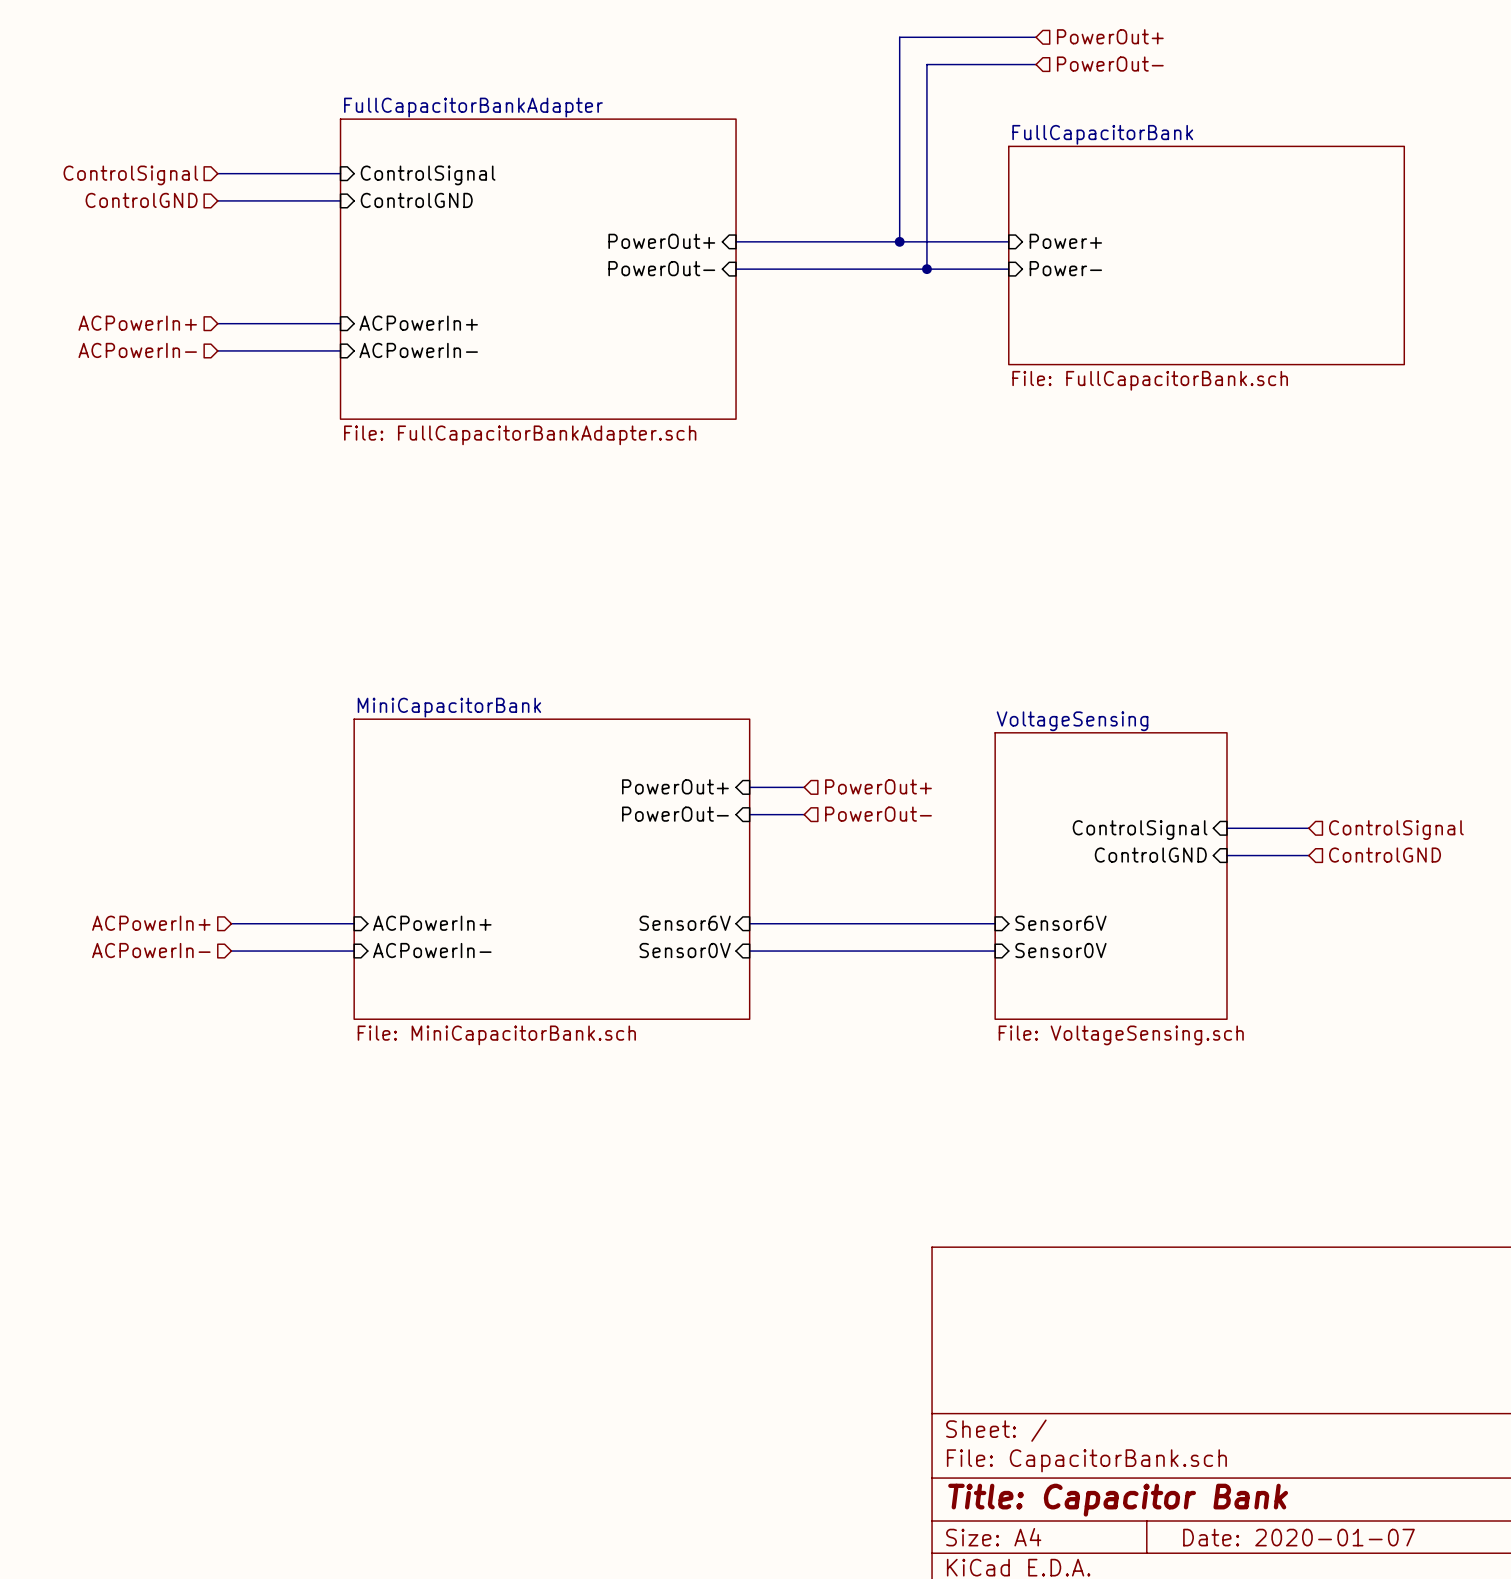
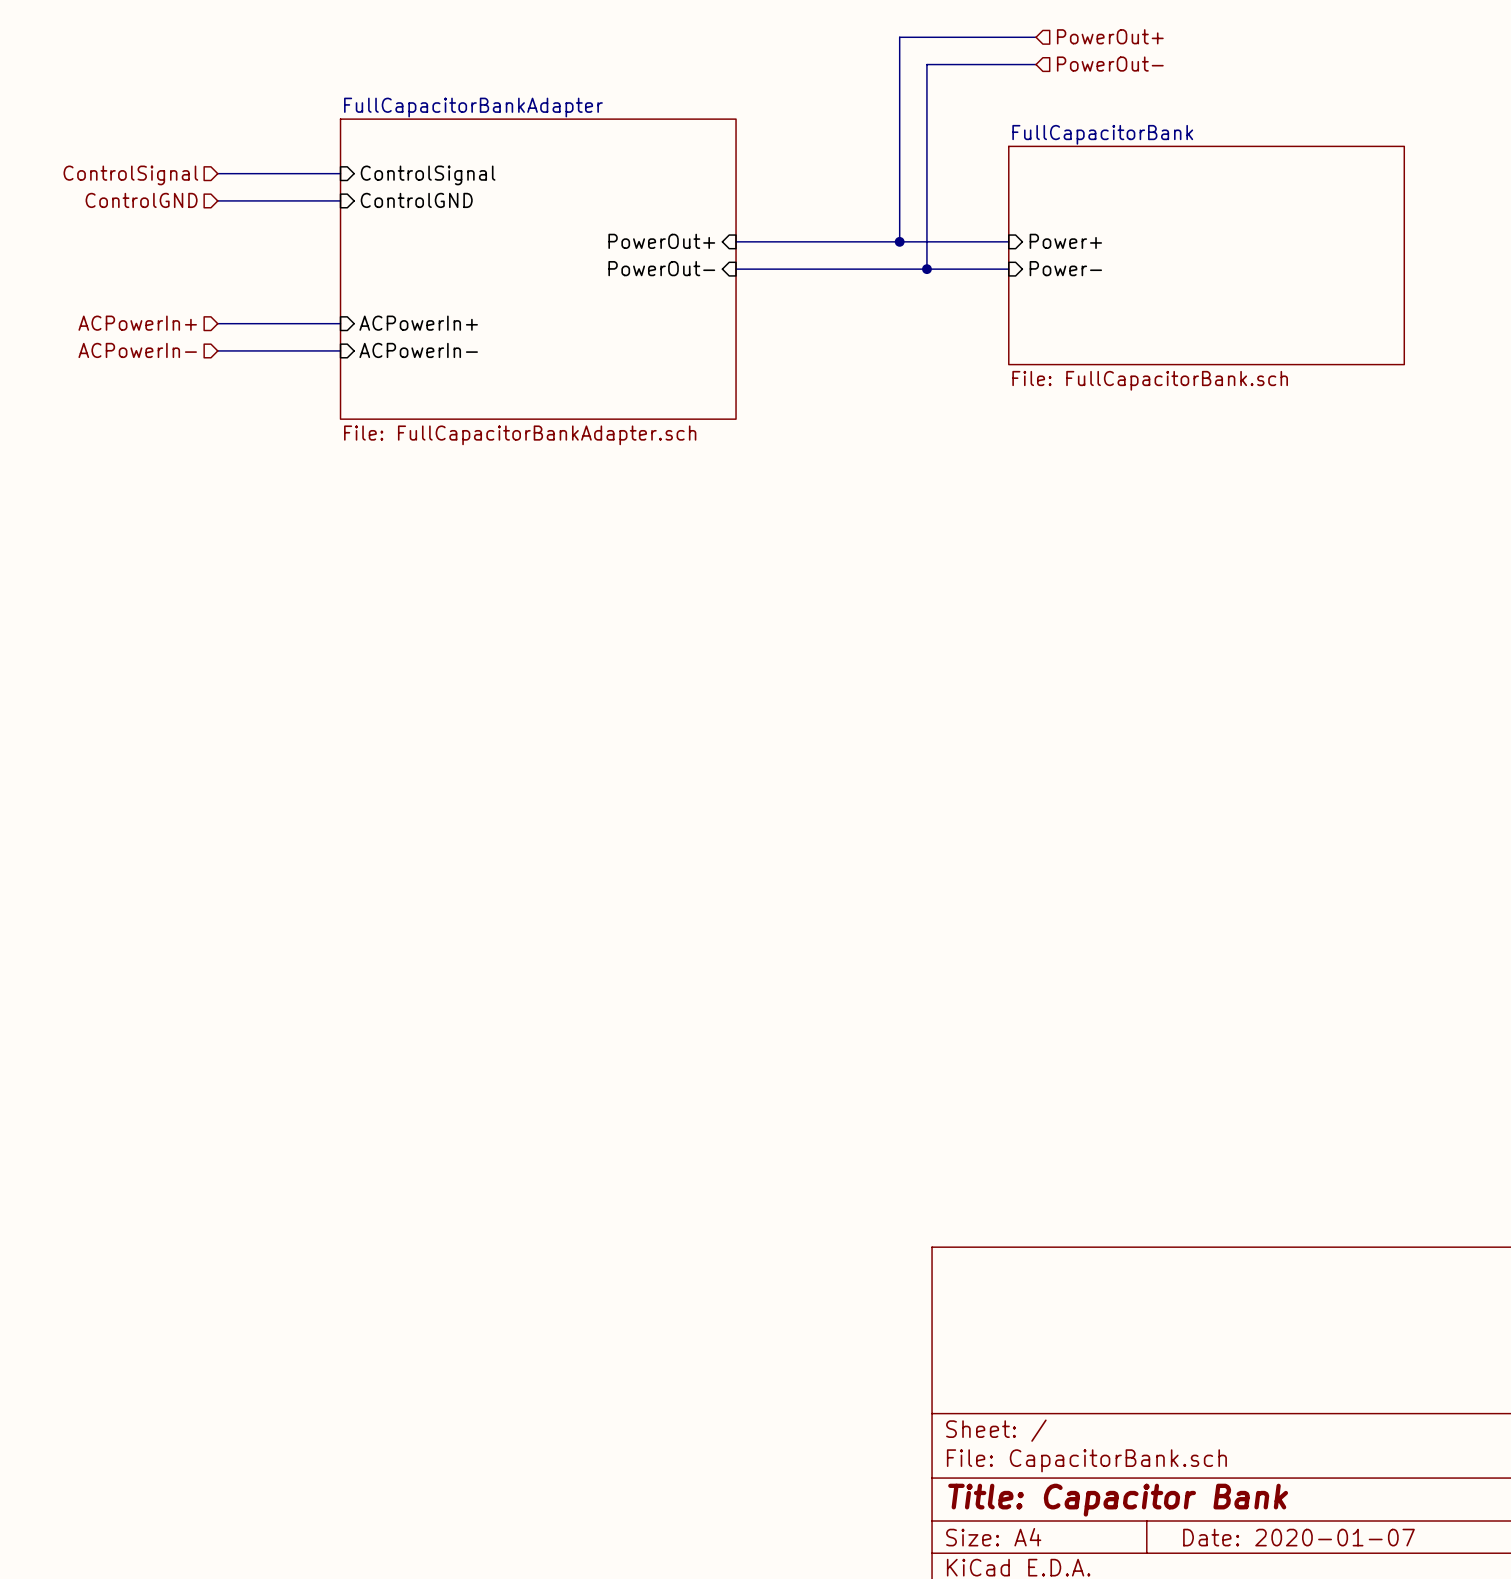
sheet pin: PowerOut+ (675, 786) -> none
hierarchical label: PowerOut+ (878, 786) -> none
wire: (749, 787) (804, 787) -> none
sheet pin: PowerOut- (675, 814) -> none
wire: (749, 814) (804, 814) -> none
hierarchical label: PowerOut- (878, 814) -> none
wire: (1226, 828) (1308, 828) -> none
sheet pin: ControlSignal (1140, 830) -> none
hierarchical label: ControlSignal (1396, 830) -> none
sheet pin: ControlGND (1150, 855) -> none
wire: (1226, 855) (1308, 855) -> none
hierarchical label: ControlGND (1385, 855) -> none
sheet MiniCapacitorBank: File: MiniCapacitorBank.sch (551, 869) -> none
sheet VoltageSensing: File: VoltageSensing.sch (1111, 876) -> none
hierarchical label: ACPowerIn+ (151, 923) -> none
wire: (231, 923) (354, 923) -> none
sheet pin: ACPowerIn+ (432, 923) -> none
sheet pin: Sensor6V (685, 923) -> none
wire: (749, 923) (995, 923) -> none
sheet pin: Sensor6V (1060, 923) -> none
hierarchical label: ACPowerIn- (151, 950) -> none
sheet pin: ACPowerIn- (432, 950) -> none
sheet pin: Sensor0V (685, 950) -> none
sheet pin: Sensor0V (1060, 950) -> none
wire: (231, 951) (354, 951) -> none
wire: (749, 951) (995, 951) -> none

